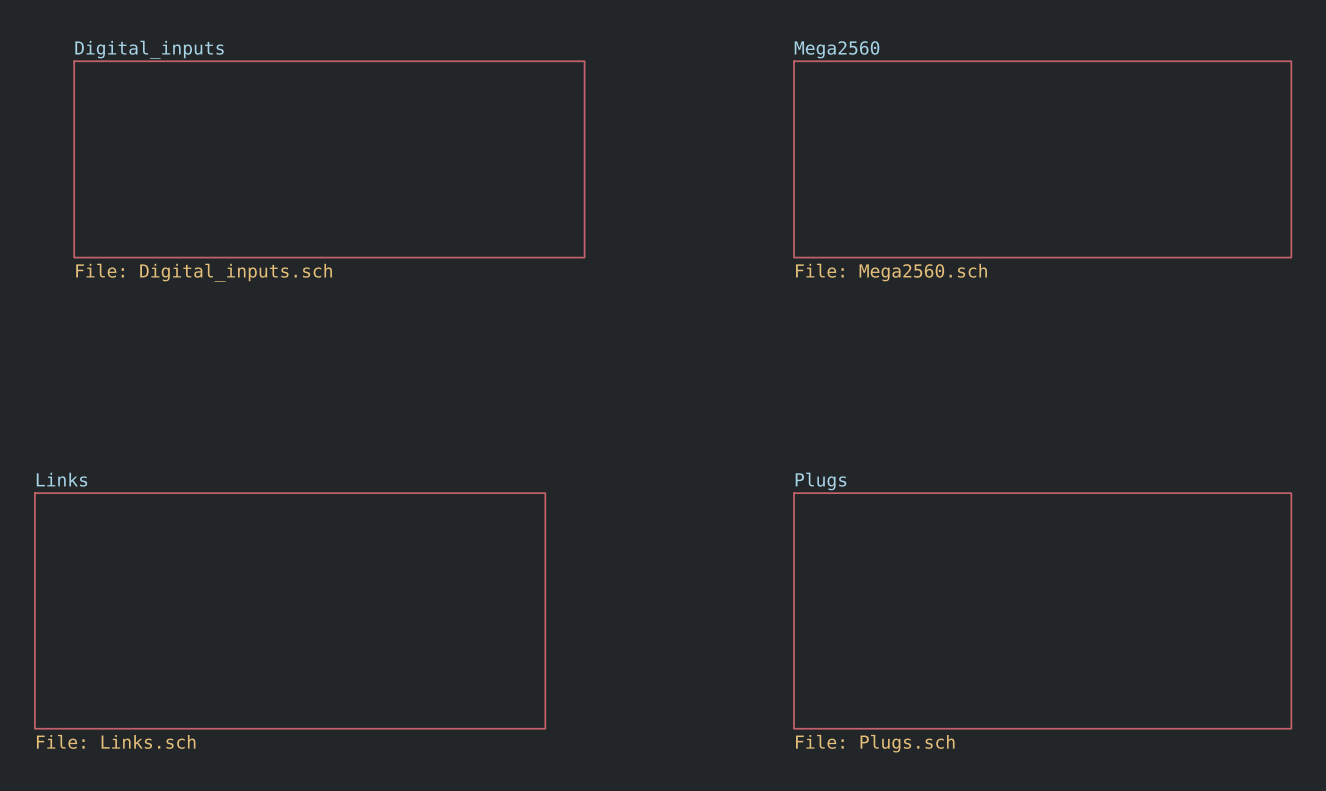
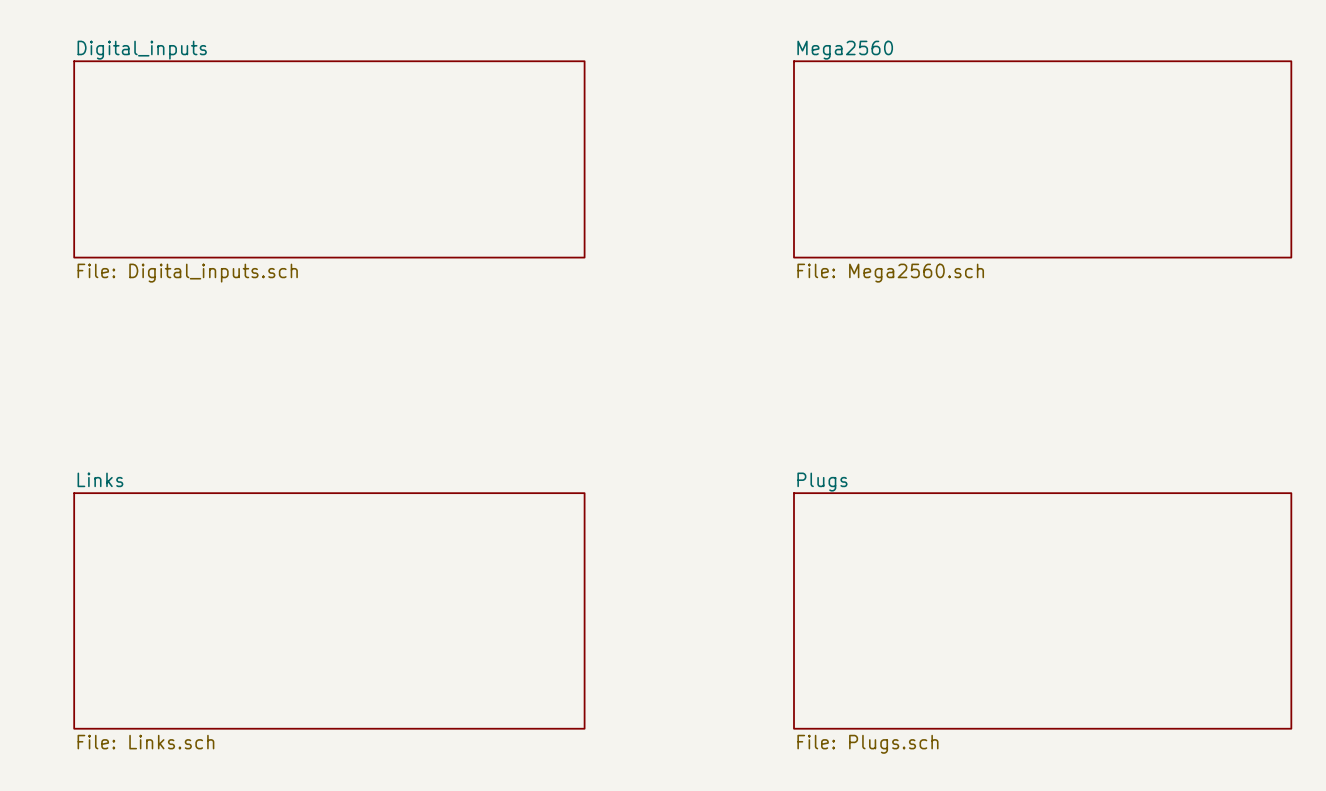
sheet Links position: (290, 610) -> (329, 610)

